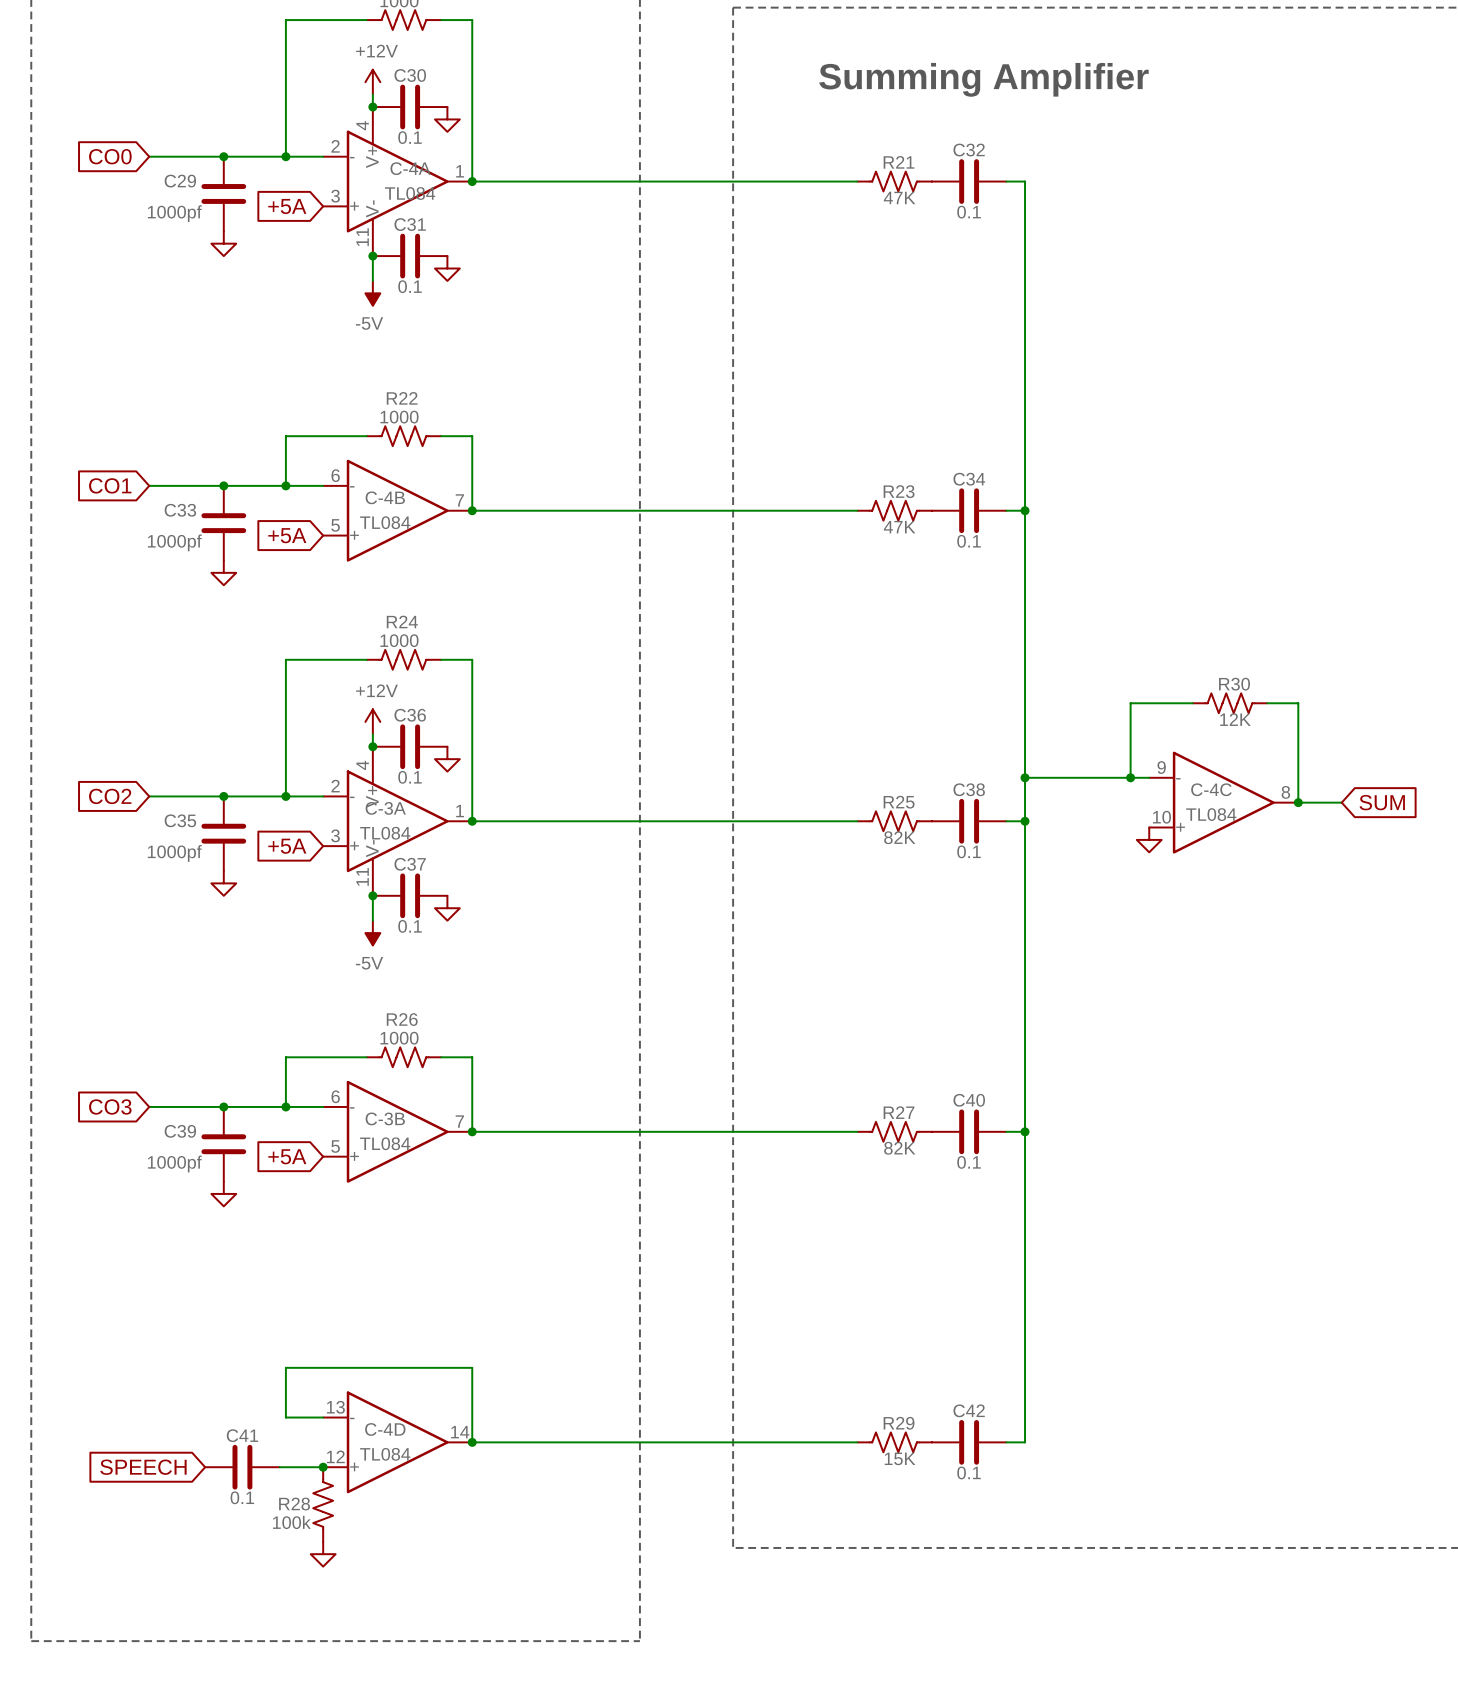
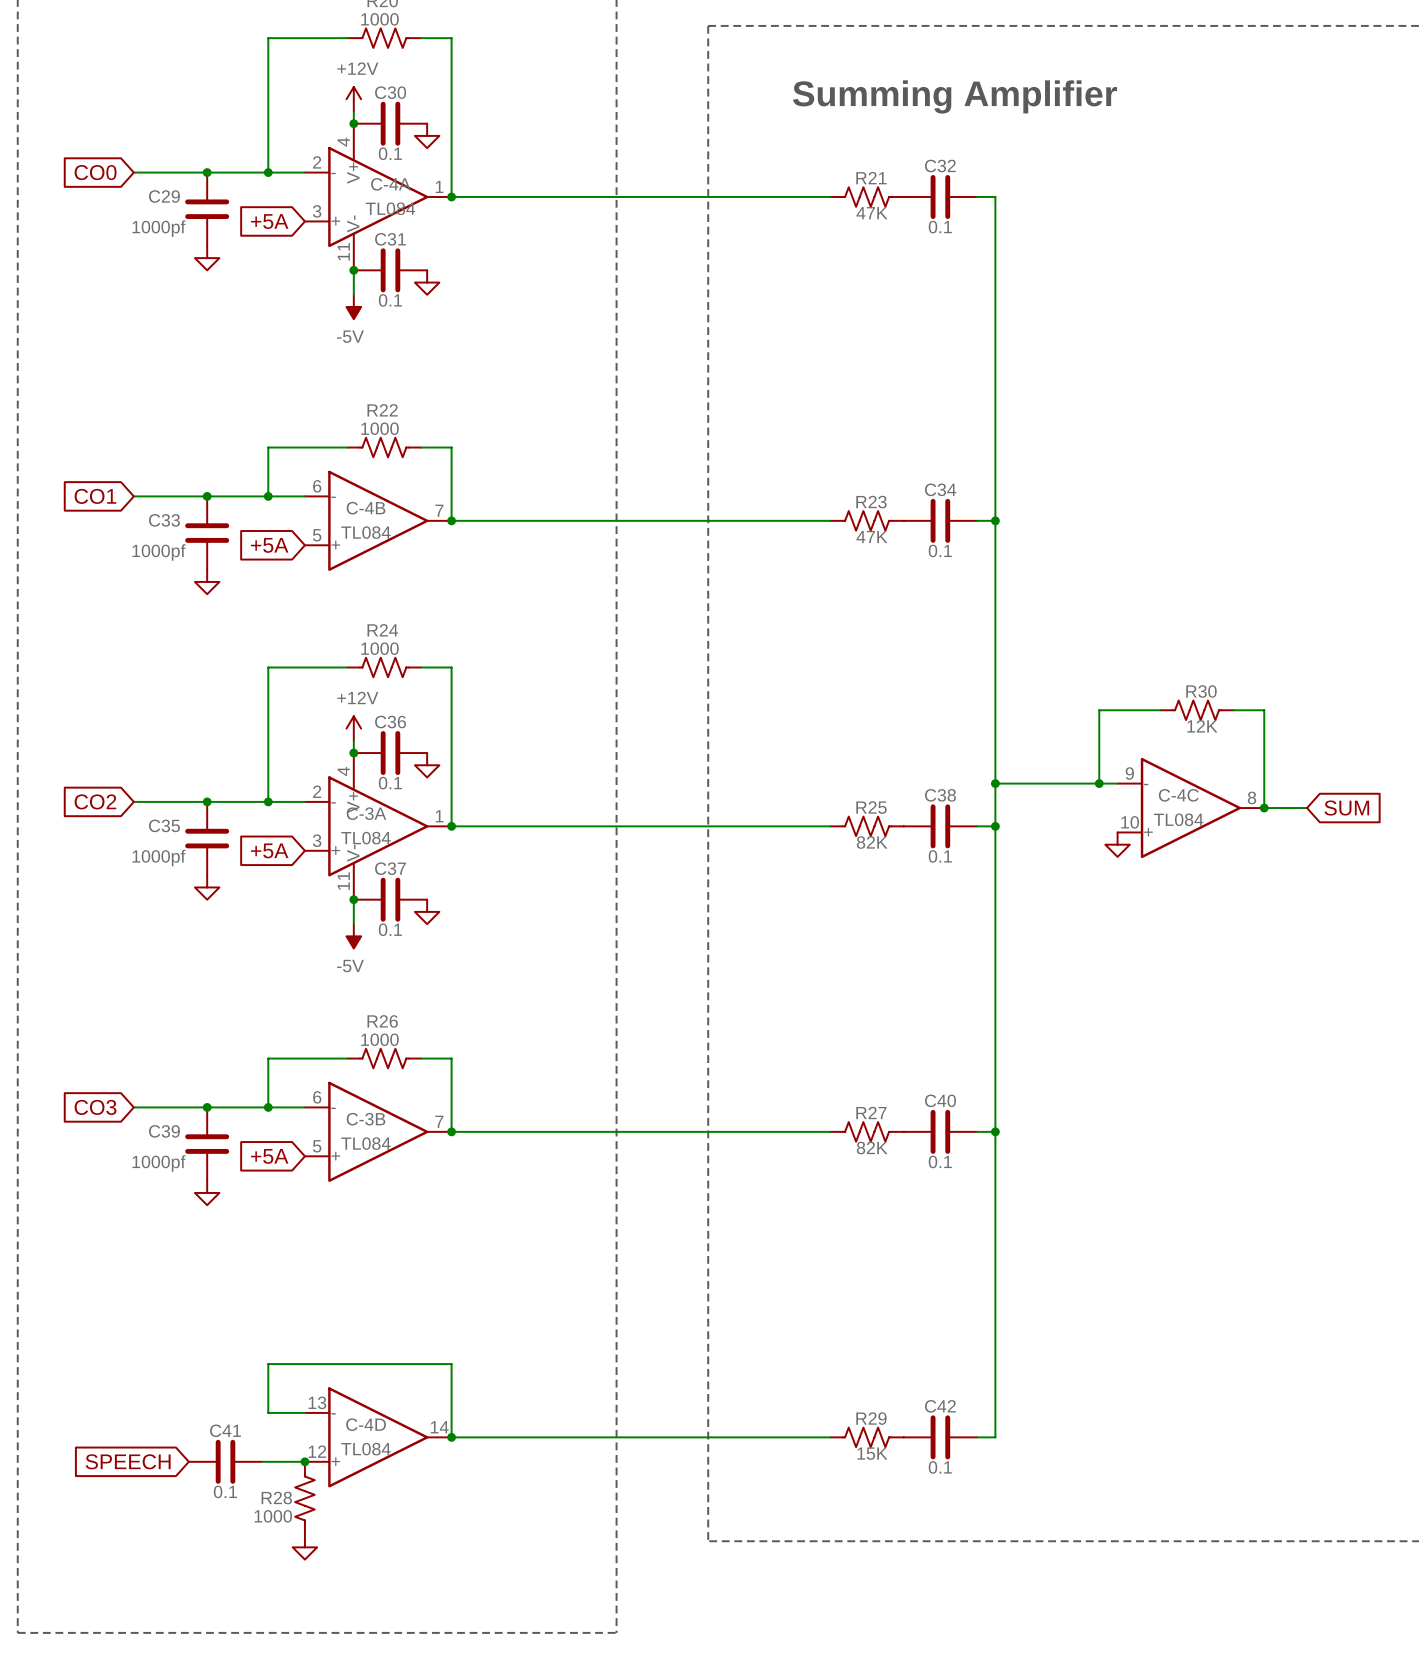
R28 value: 100k (291, 1522) -> 1000 (273, 1516)

